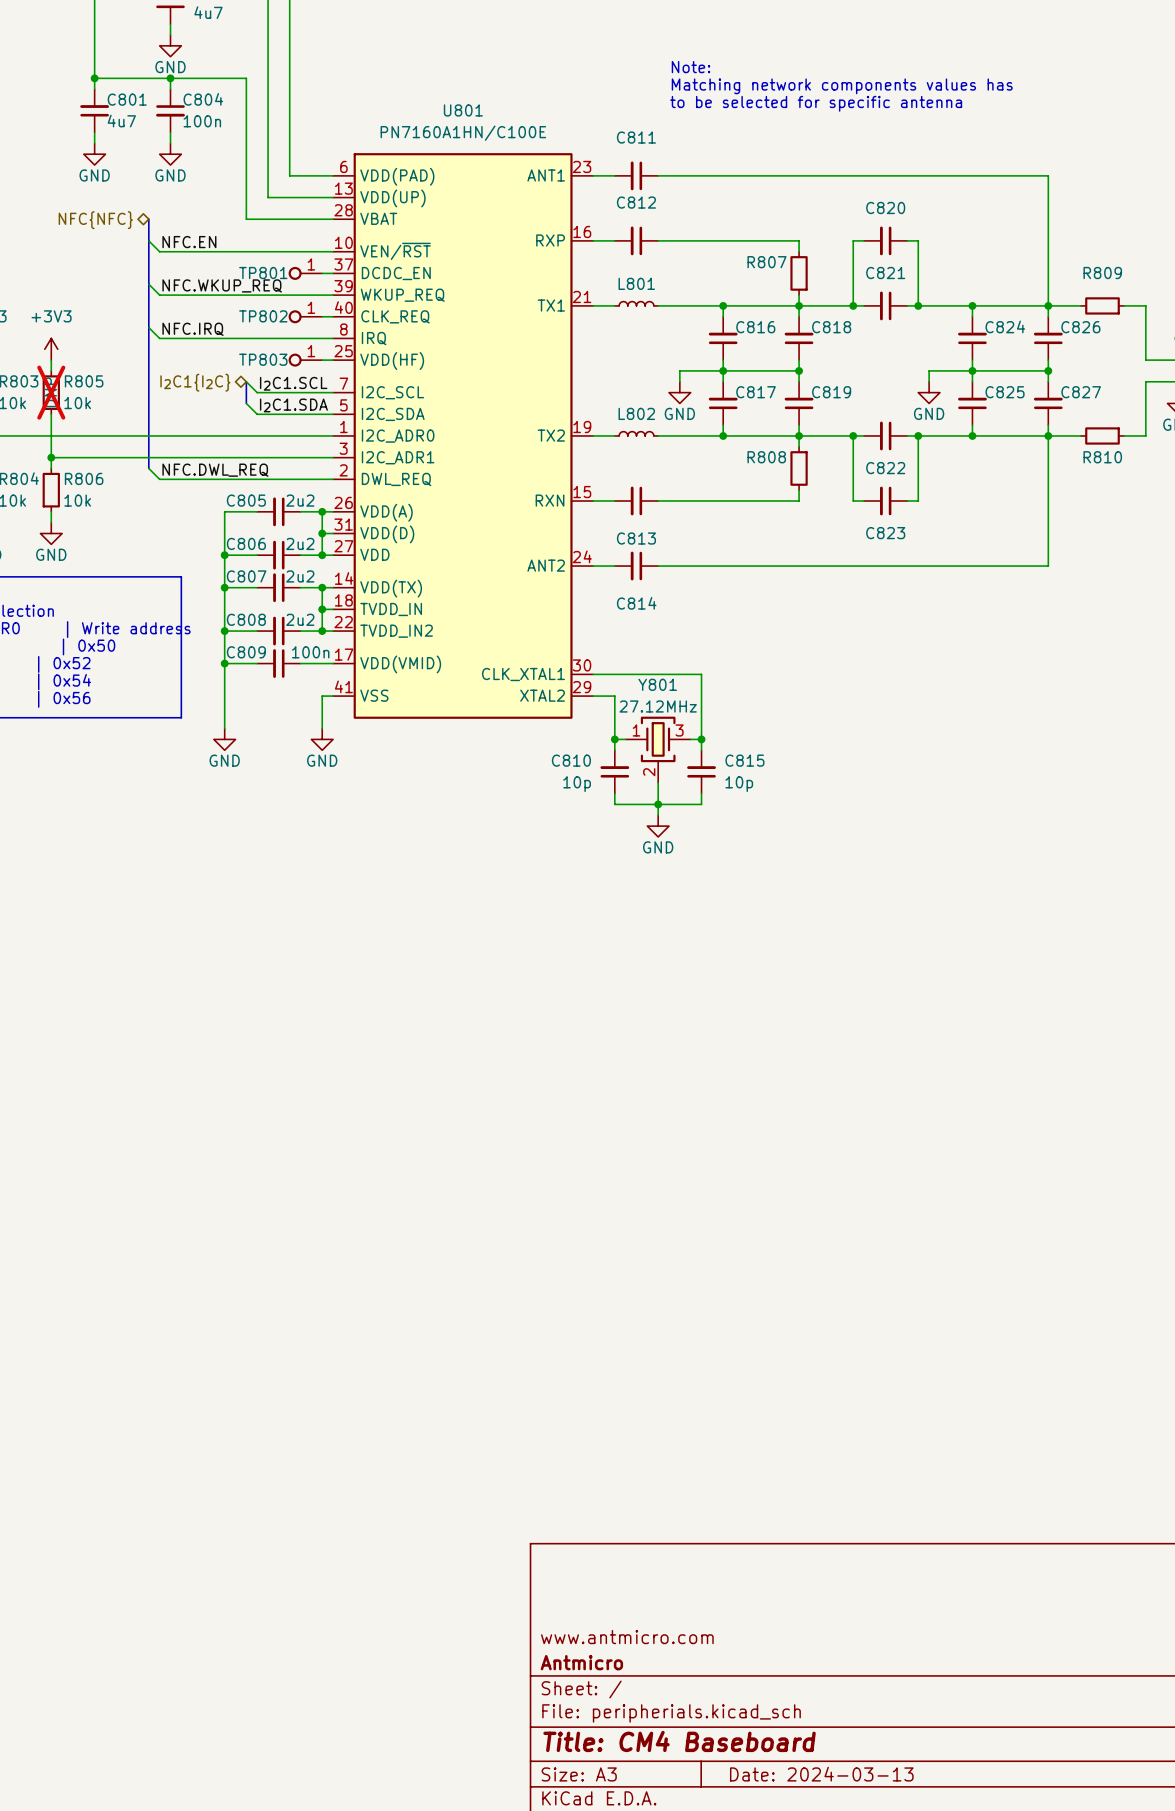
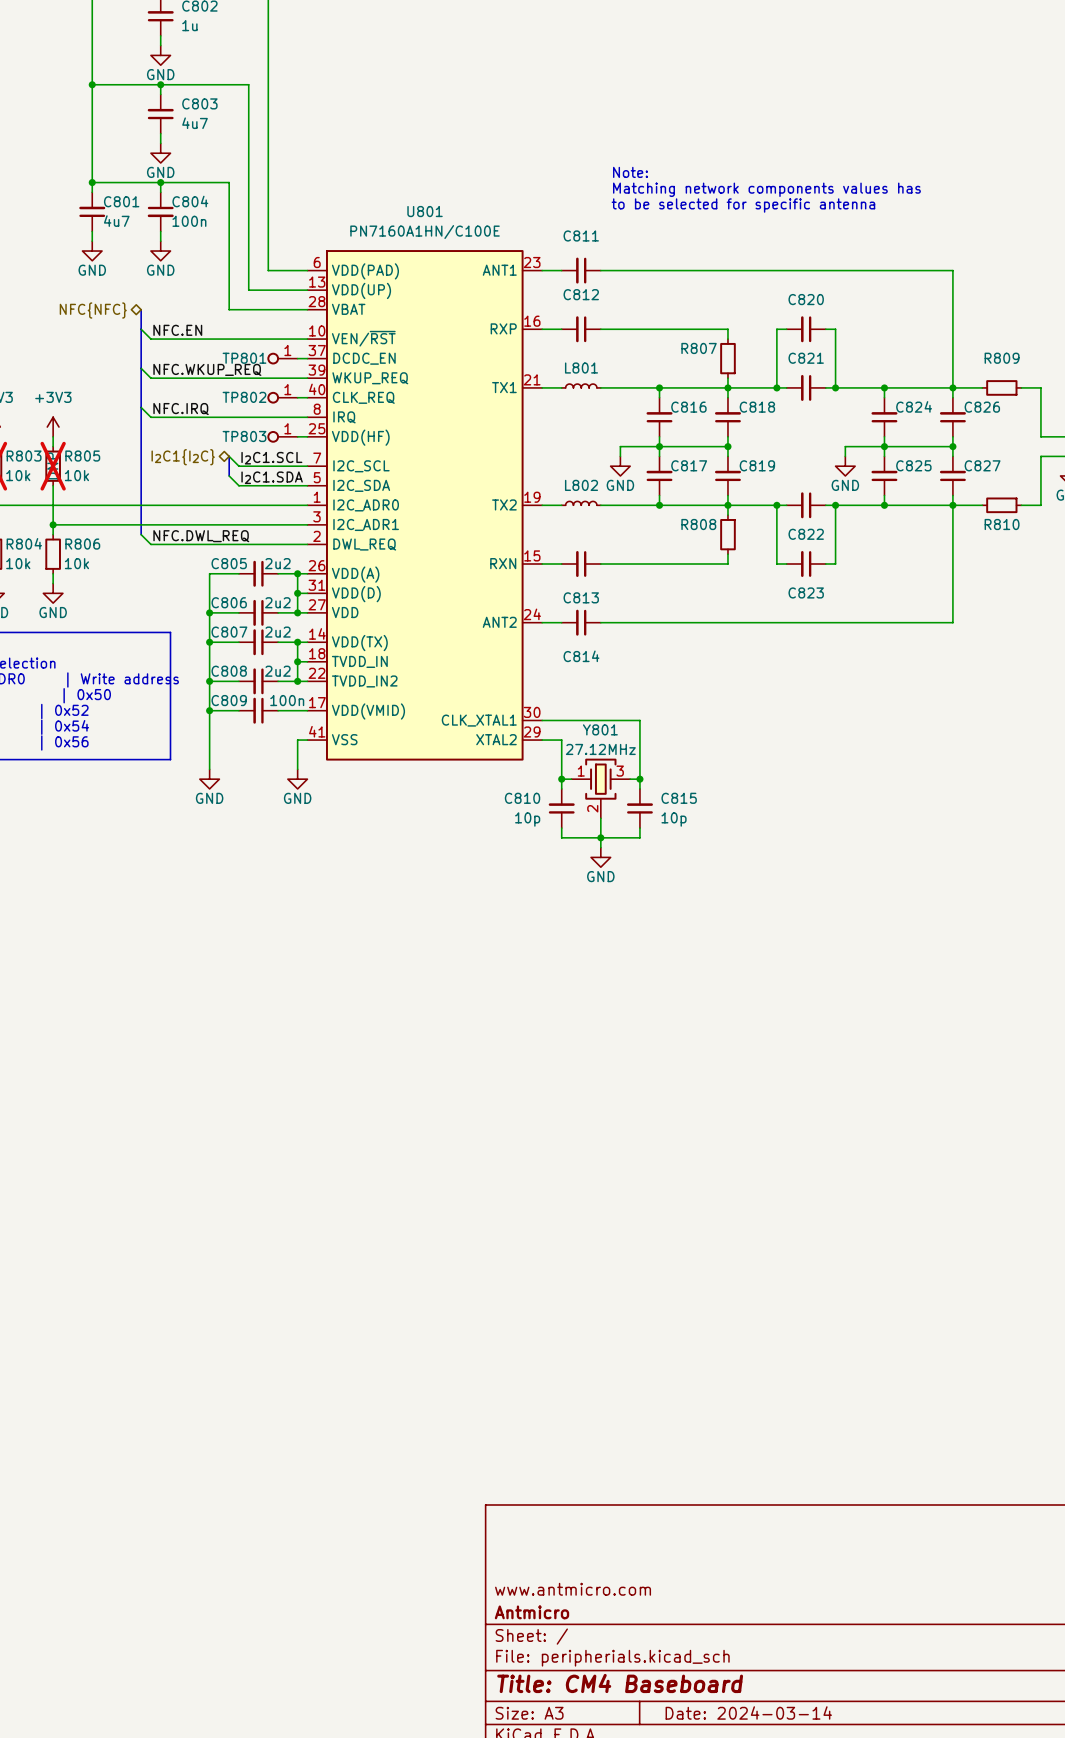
title block: Date: 2024-03-13 (821, 1774) -> Date: 2024-03-14 (748, 1712)

